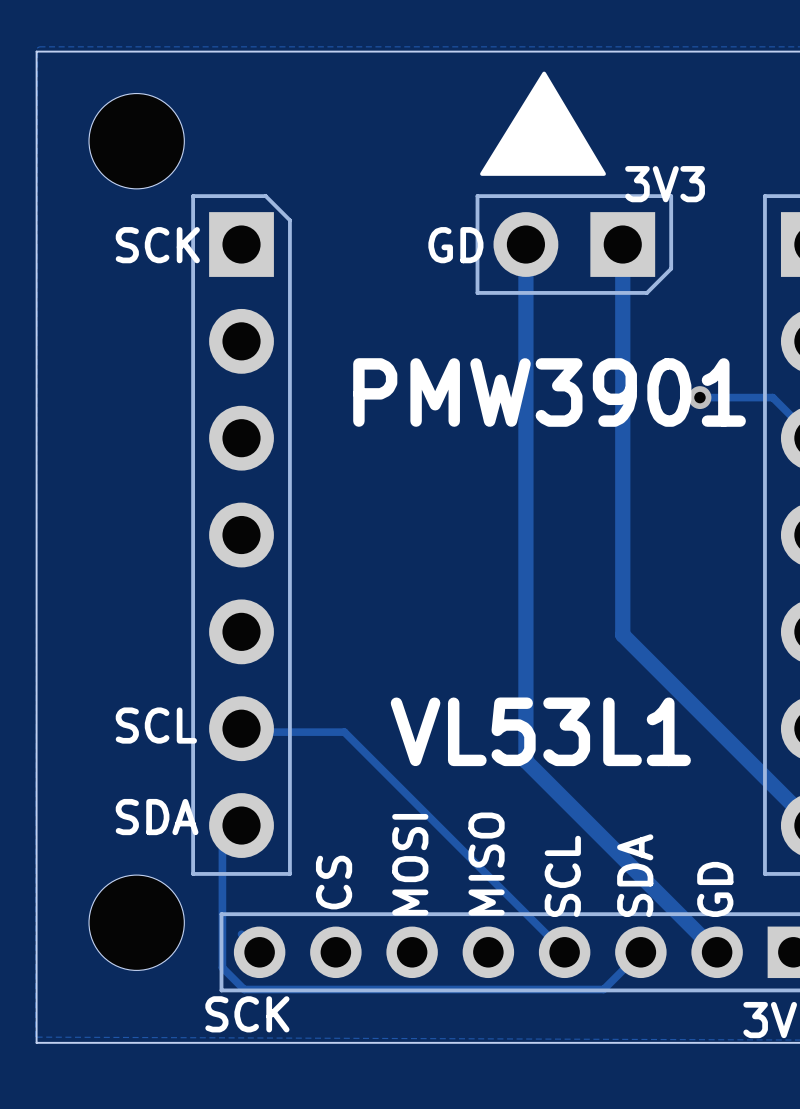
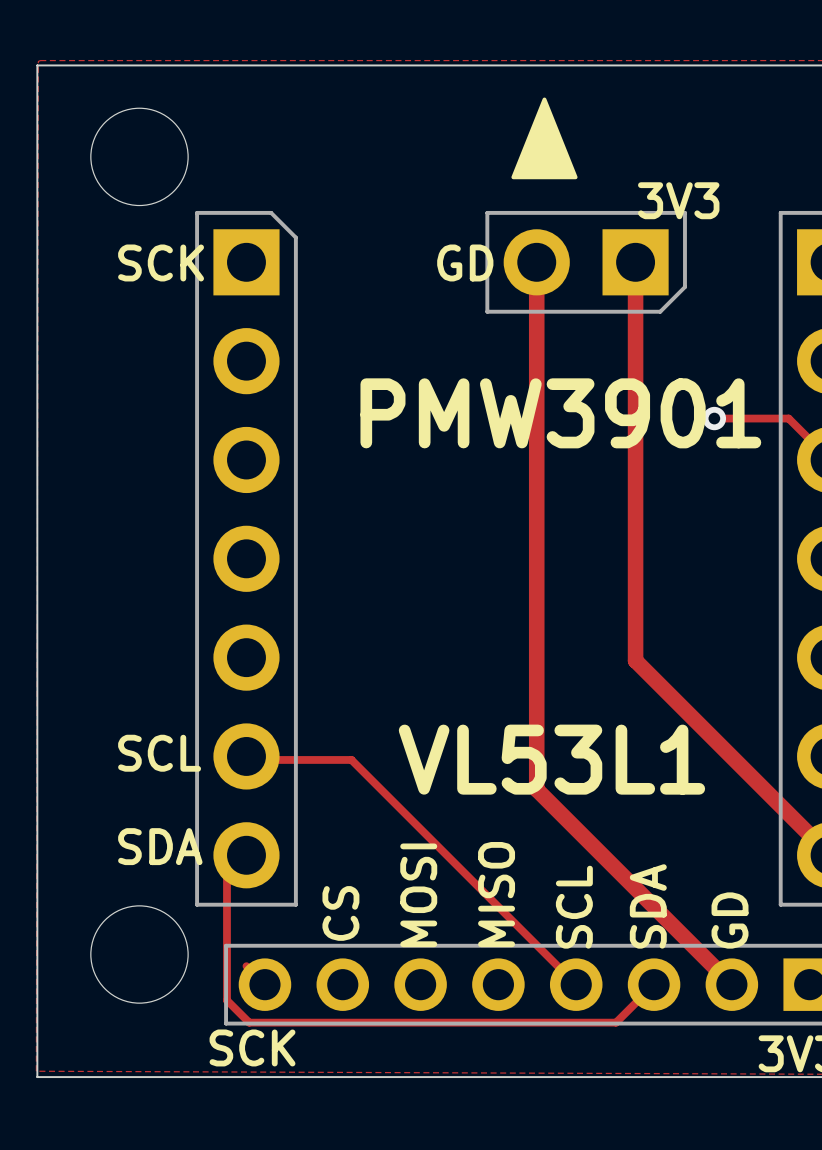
drawing shape: [480, 71, 606, 176] -> [511, 97, 578, 180]

